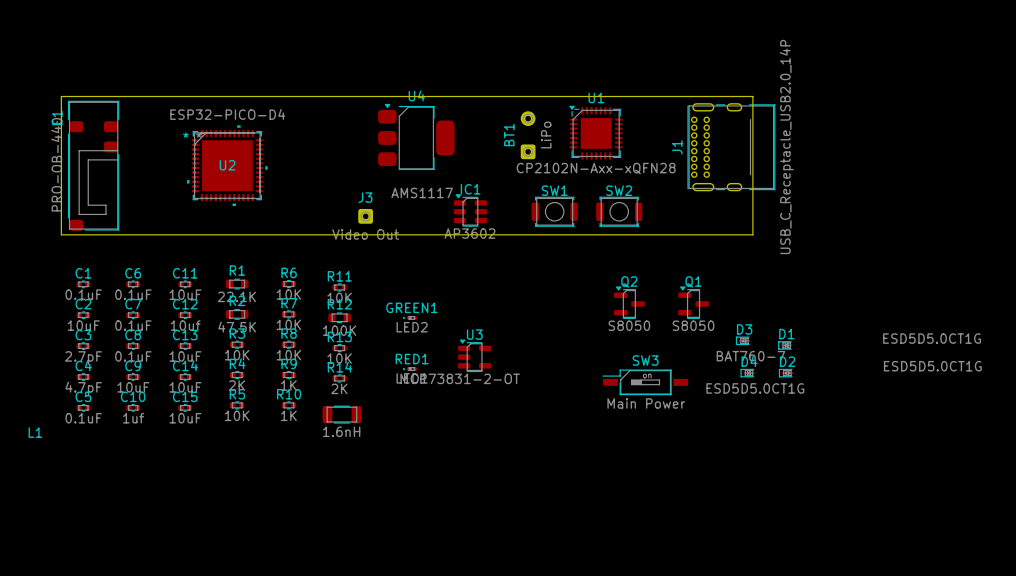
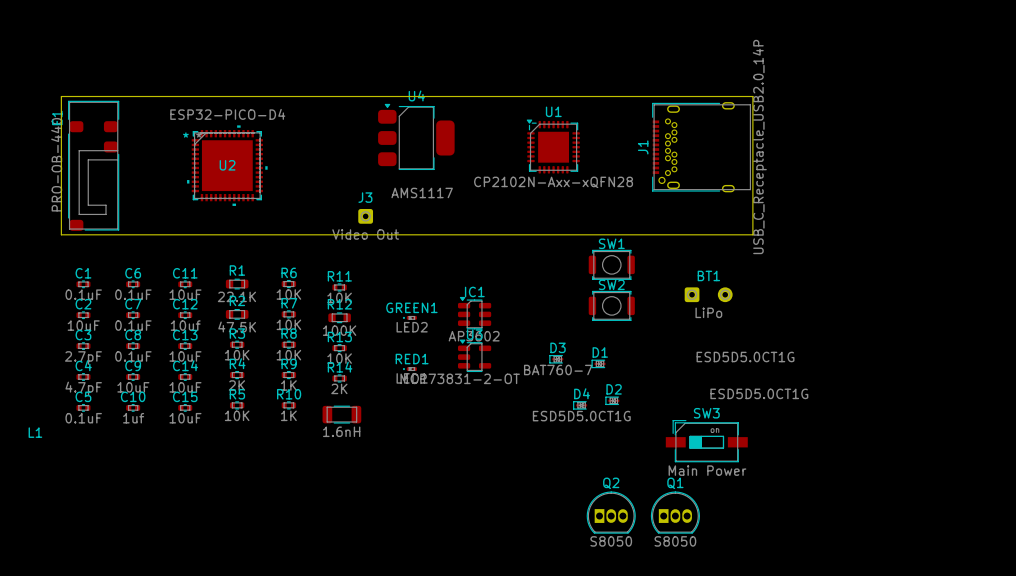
J1 footprint: [687, 103, 776, 192] -> [652, 102, 751, 193]
U1 position: (595, 132) -> (553, 146)
BT1 rotation: 0° (528, 135) -> 90° clockwise (708, 294)
BT1 position: (528, 135) -> (708, 294)
IC1 position: (470, 210) -> (474, 313)
SW1 position: (554, 211) -> (611, 264)
SW2 position: (619, 211) -> (611, 305)
Q2 footprint: [613, 286, 645, 319] -> [586, 491, 636, 534]
Q1 footprint: [678, 286, 709, 319] -> [650, 491, 700, 534]
D3 position: (742, 340) -> (556, 359)
D1 position: (785, 345) -> (598, 363)
D3 value position: BAT760-7 (750, 356) -> BAT760-7 (558, 370)
SW3 footprint: [602, 369, 689, 396] -> [665, 420, 748, 463]
D4 position: (747, 373) -> (580, 405)
D2 position: (785, 373) -> (612, 400)
D4 value position: ESD5D5.0CT1G (755, 388) -> ESD5D5.0CT1G (581, 416)

